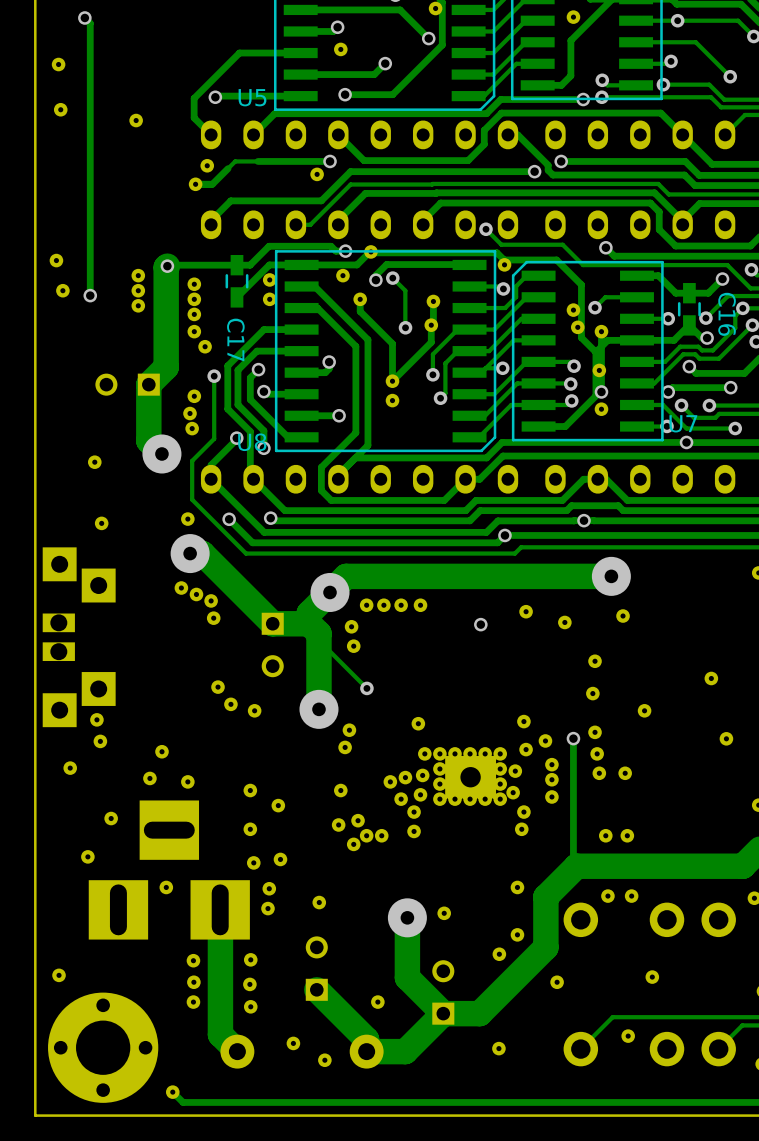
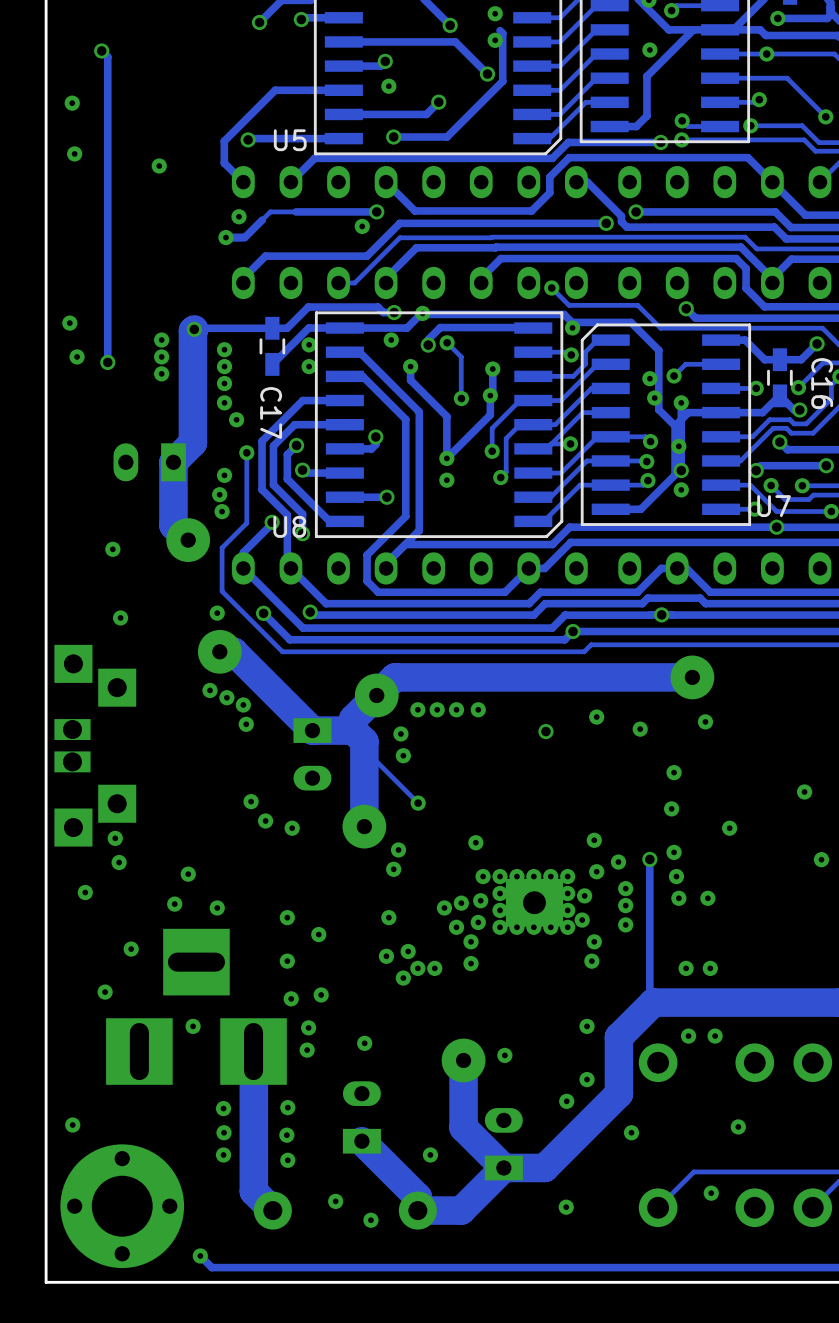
part footprint: [95, 373, 160, 396] -> [113, 443, 186, 482]
part footprint: [261, 612, 284, 678] -> [293, 718, 332, 791]
part footprint: [305, 936, 328, 1001] -> [342, 1081, 381, 1154]
part footprint: [432, 960, 455, 1025] -> [484, 1108, 523, 1181]

